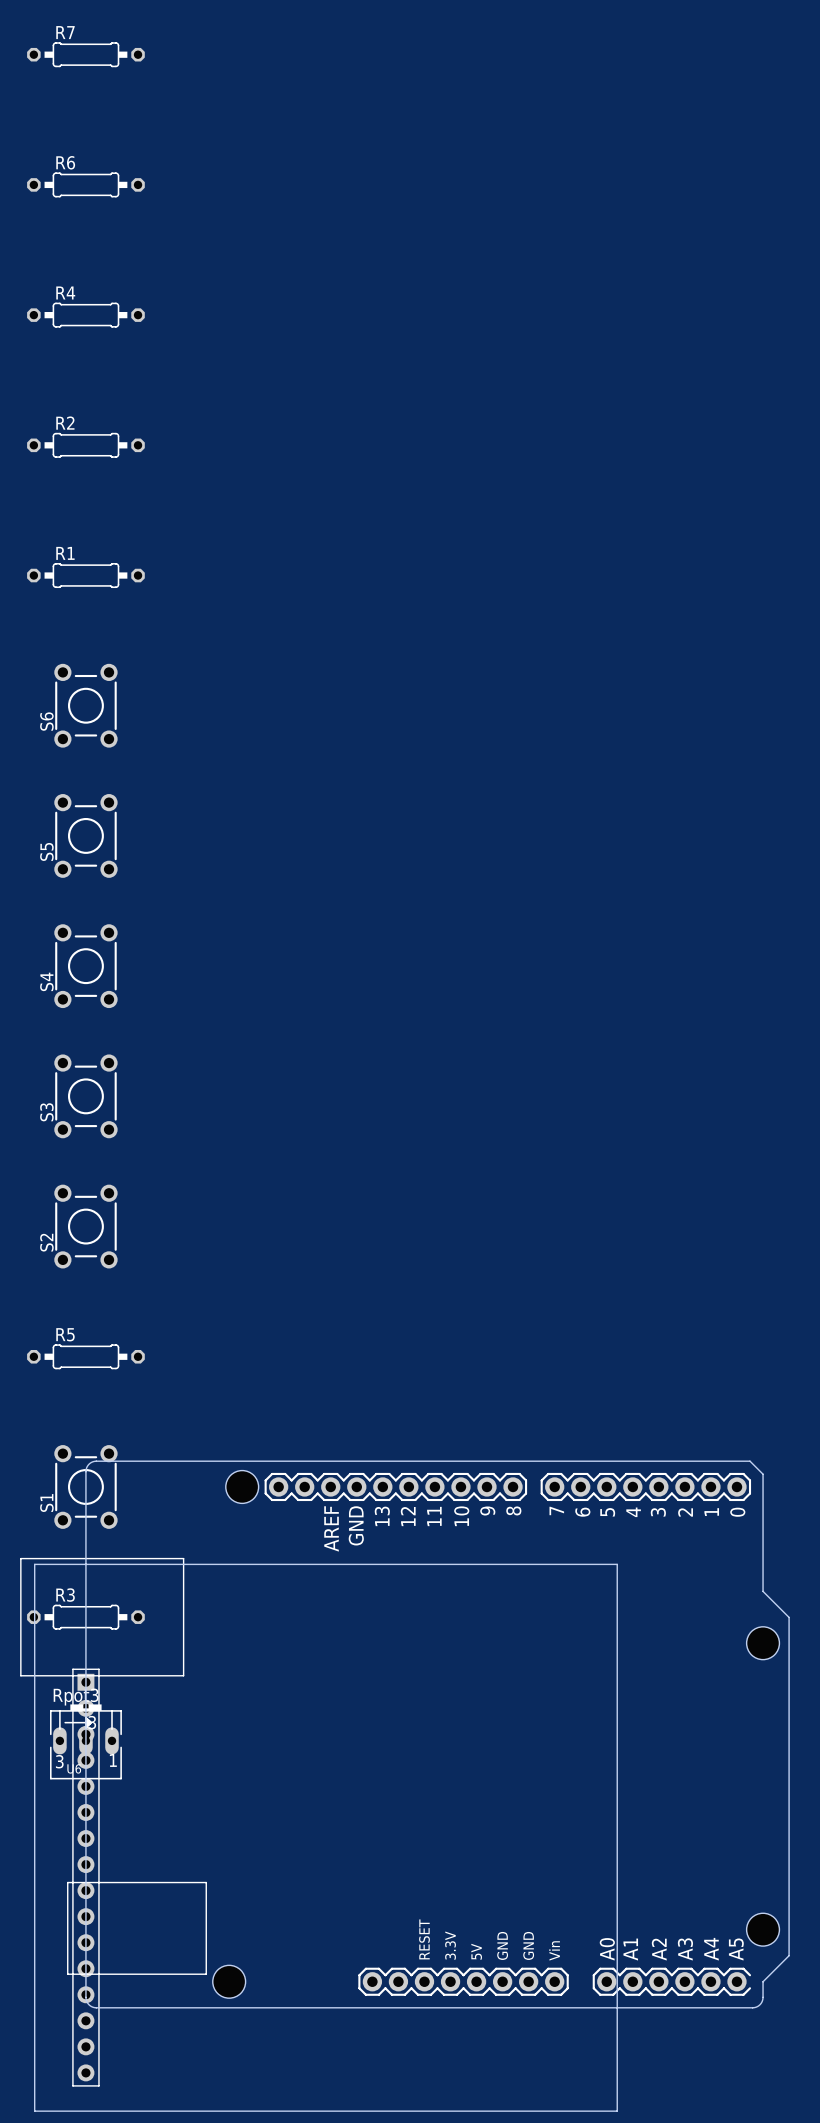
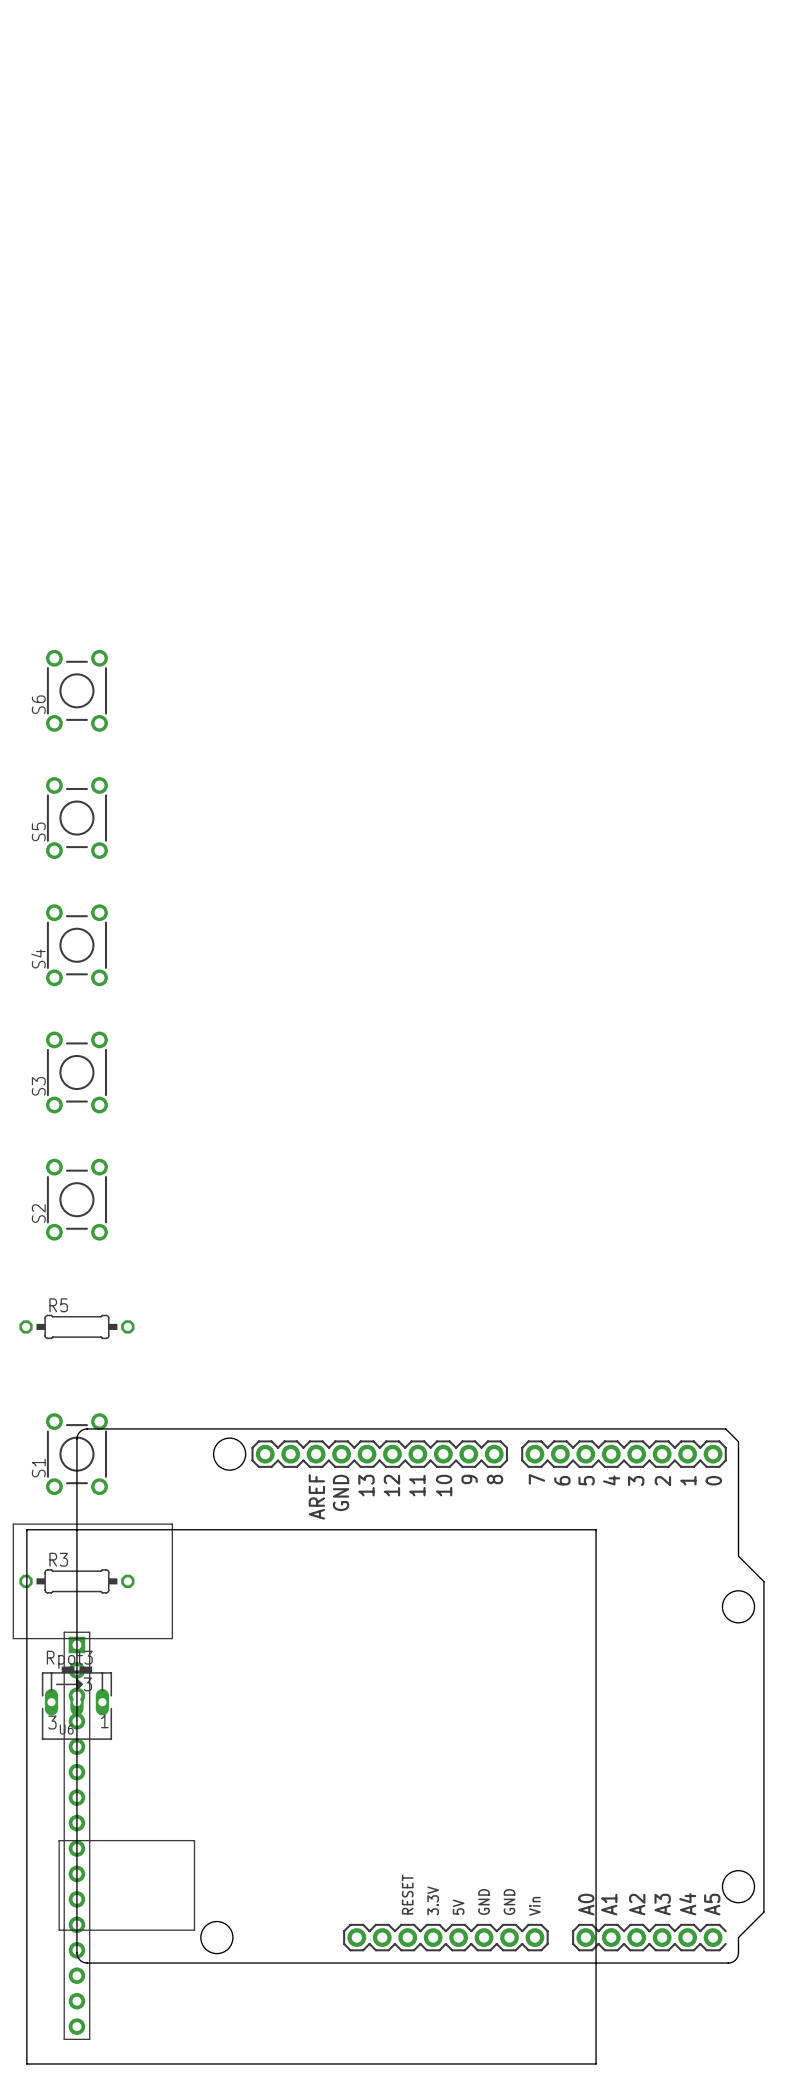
R7: (85, 54) -> none
R6: (85, 184) -> none
R4: (85, 315) -> none
R2: (85, 445) -> none
R1: (85, 575) -> none

